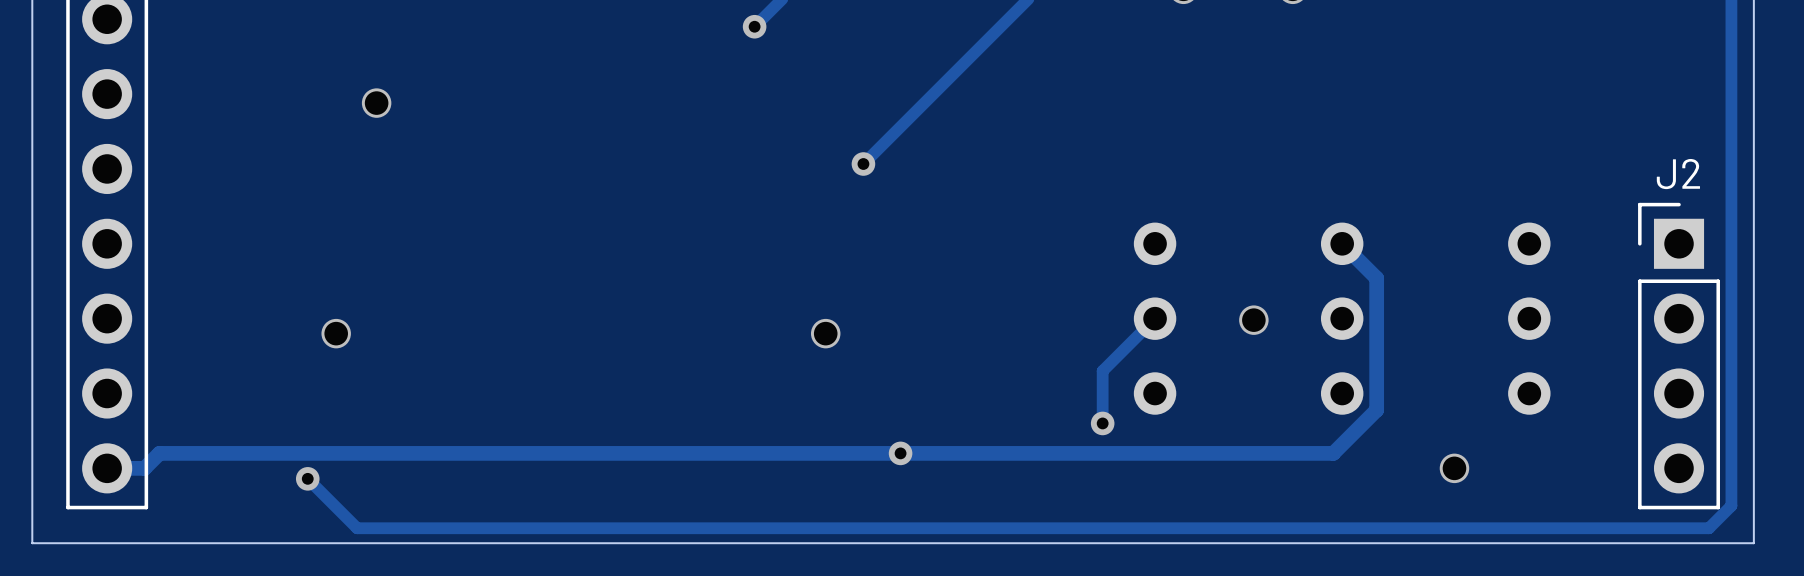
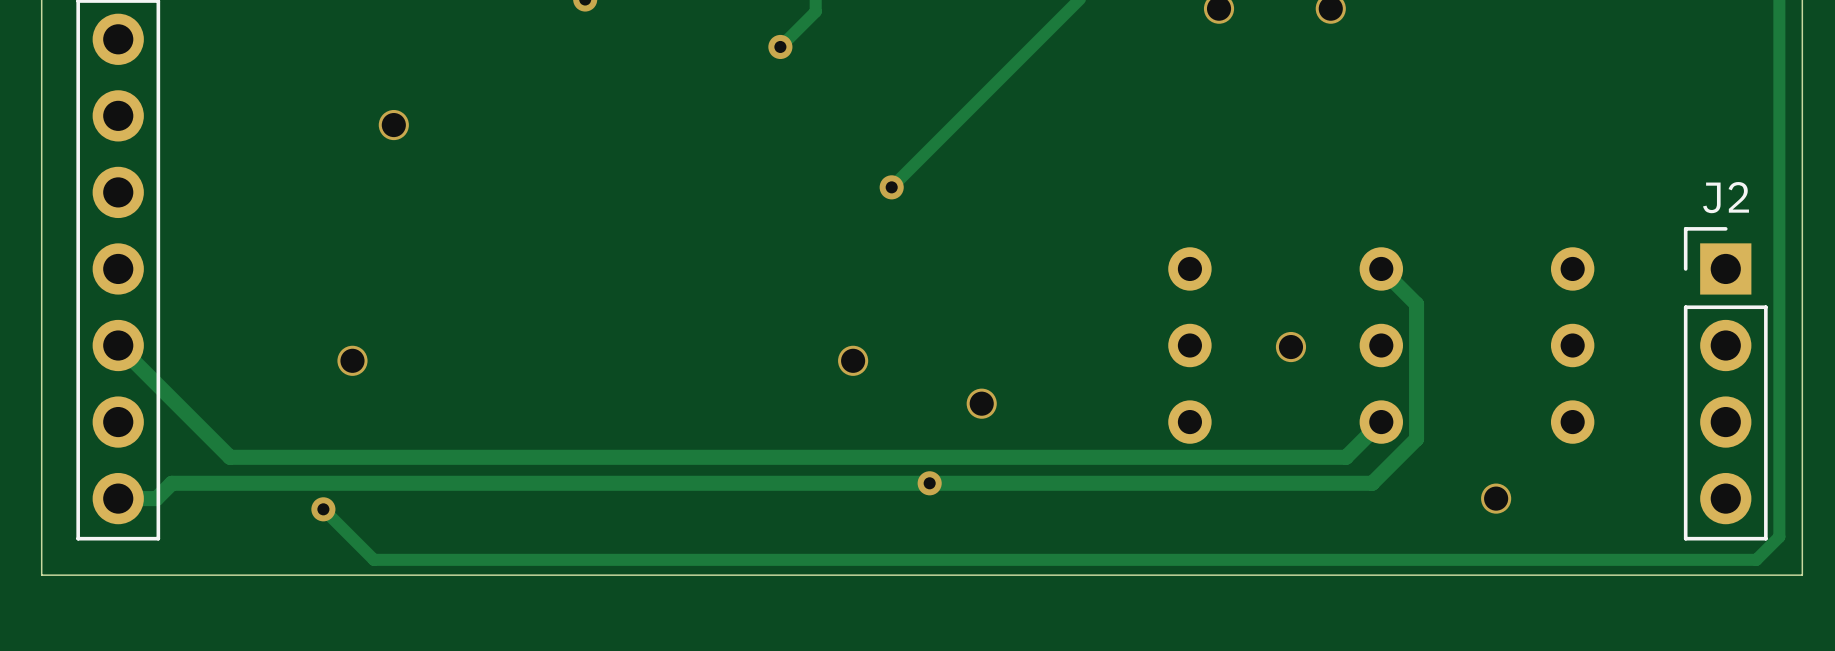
track: none -> (118, 345) (230, 457) (1346, 457) (1381, 422)
track: (1155, 318) (1102, 371) (1102, 423) -> none
via: none -> (981, 403)
via: (1102, 423) -> none

